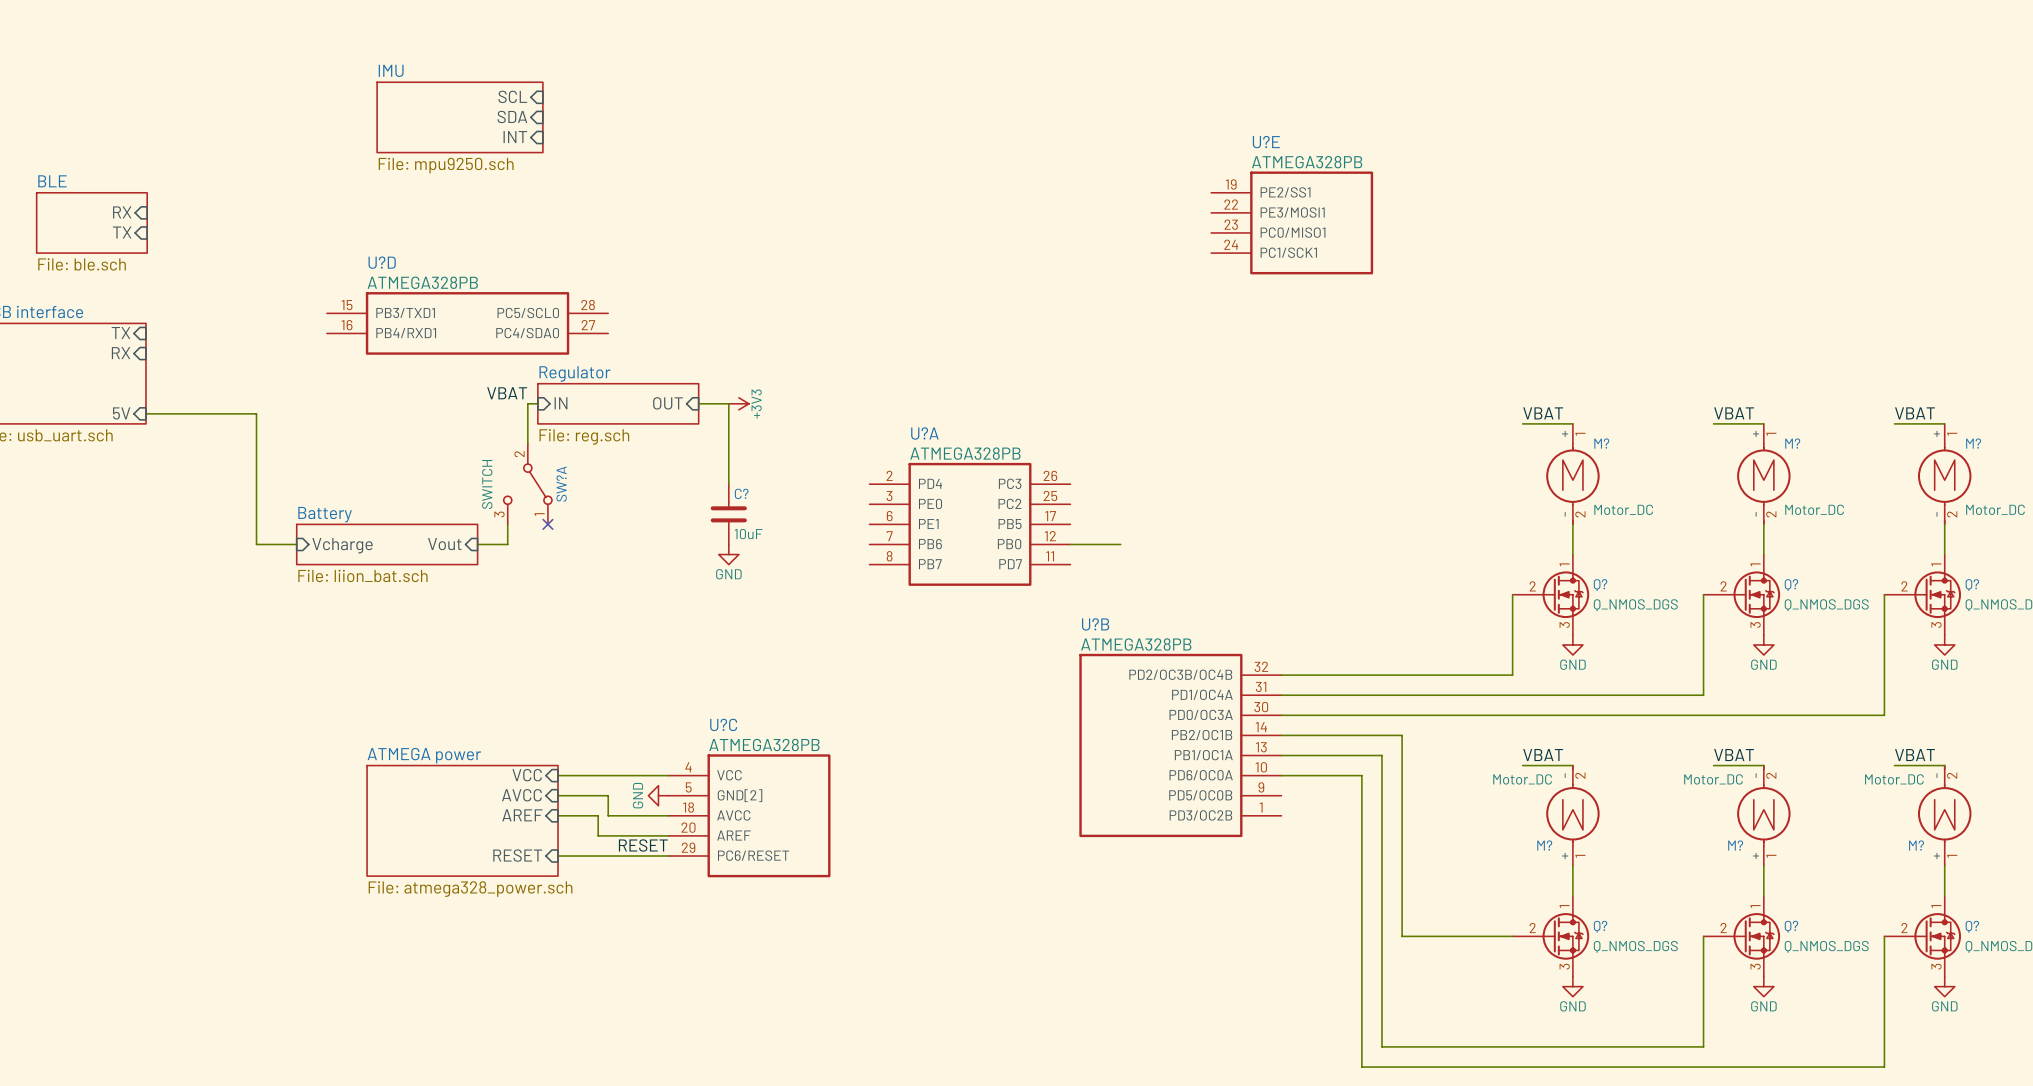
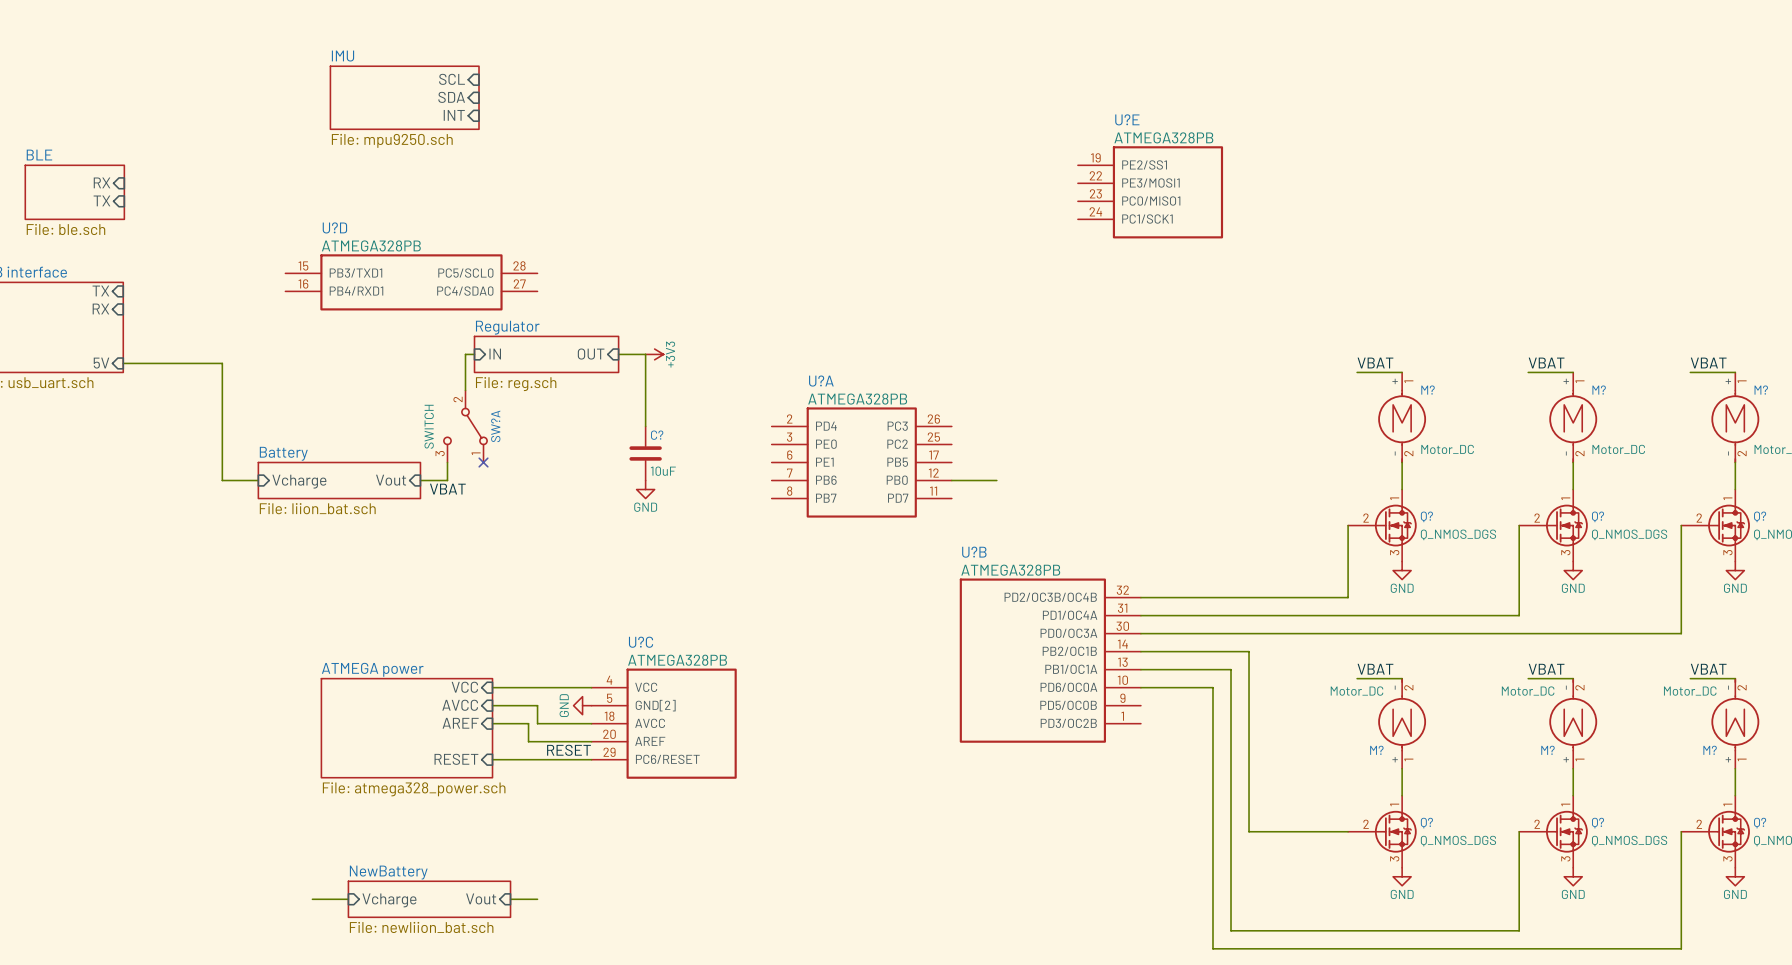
label position: VBAT (507, 393) -> VBAT (447, 489)
wire: none -> (312, 899) (348, 899)
sheet NewBattery: none -> File: newliion_bat.sch (429, 899)
sheet pin: none -> Vout (481, 898)
wire: none -> (510, 899) (537, 899)
sheet pin: none -> Vcharge (389, 900)

